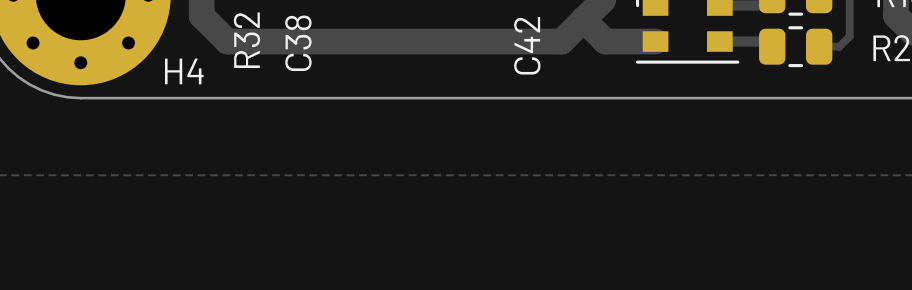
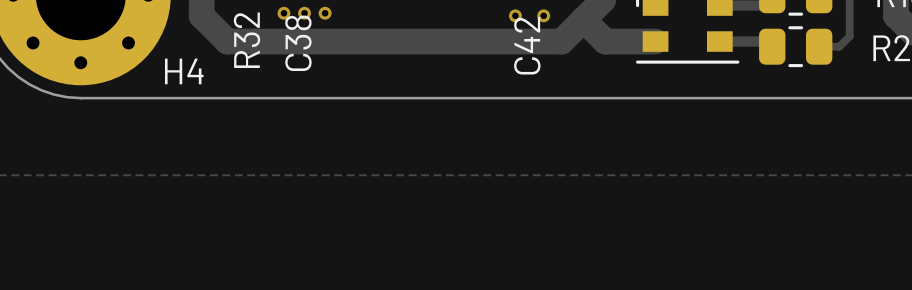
via: none -> (283, 13)
via: none -> (304, 13)
via: none -> (325, 13)
via: none -> (515, 15)
via: none -> (543, 15)

